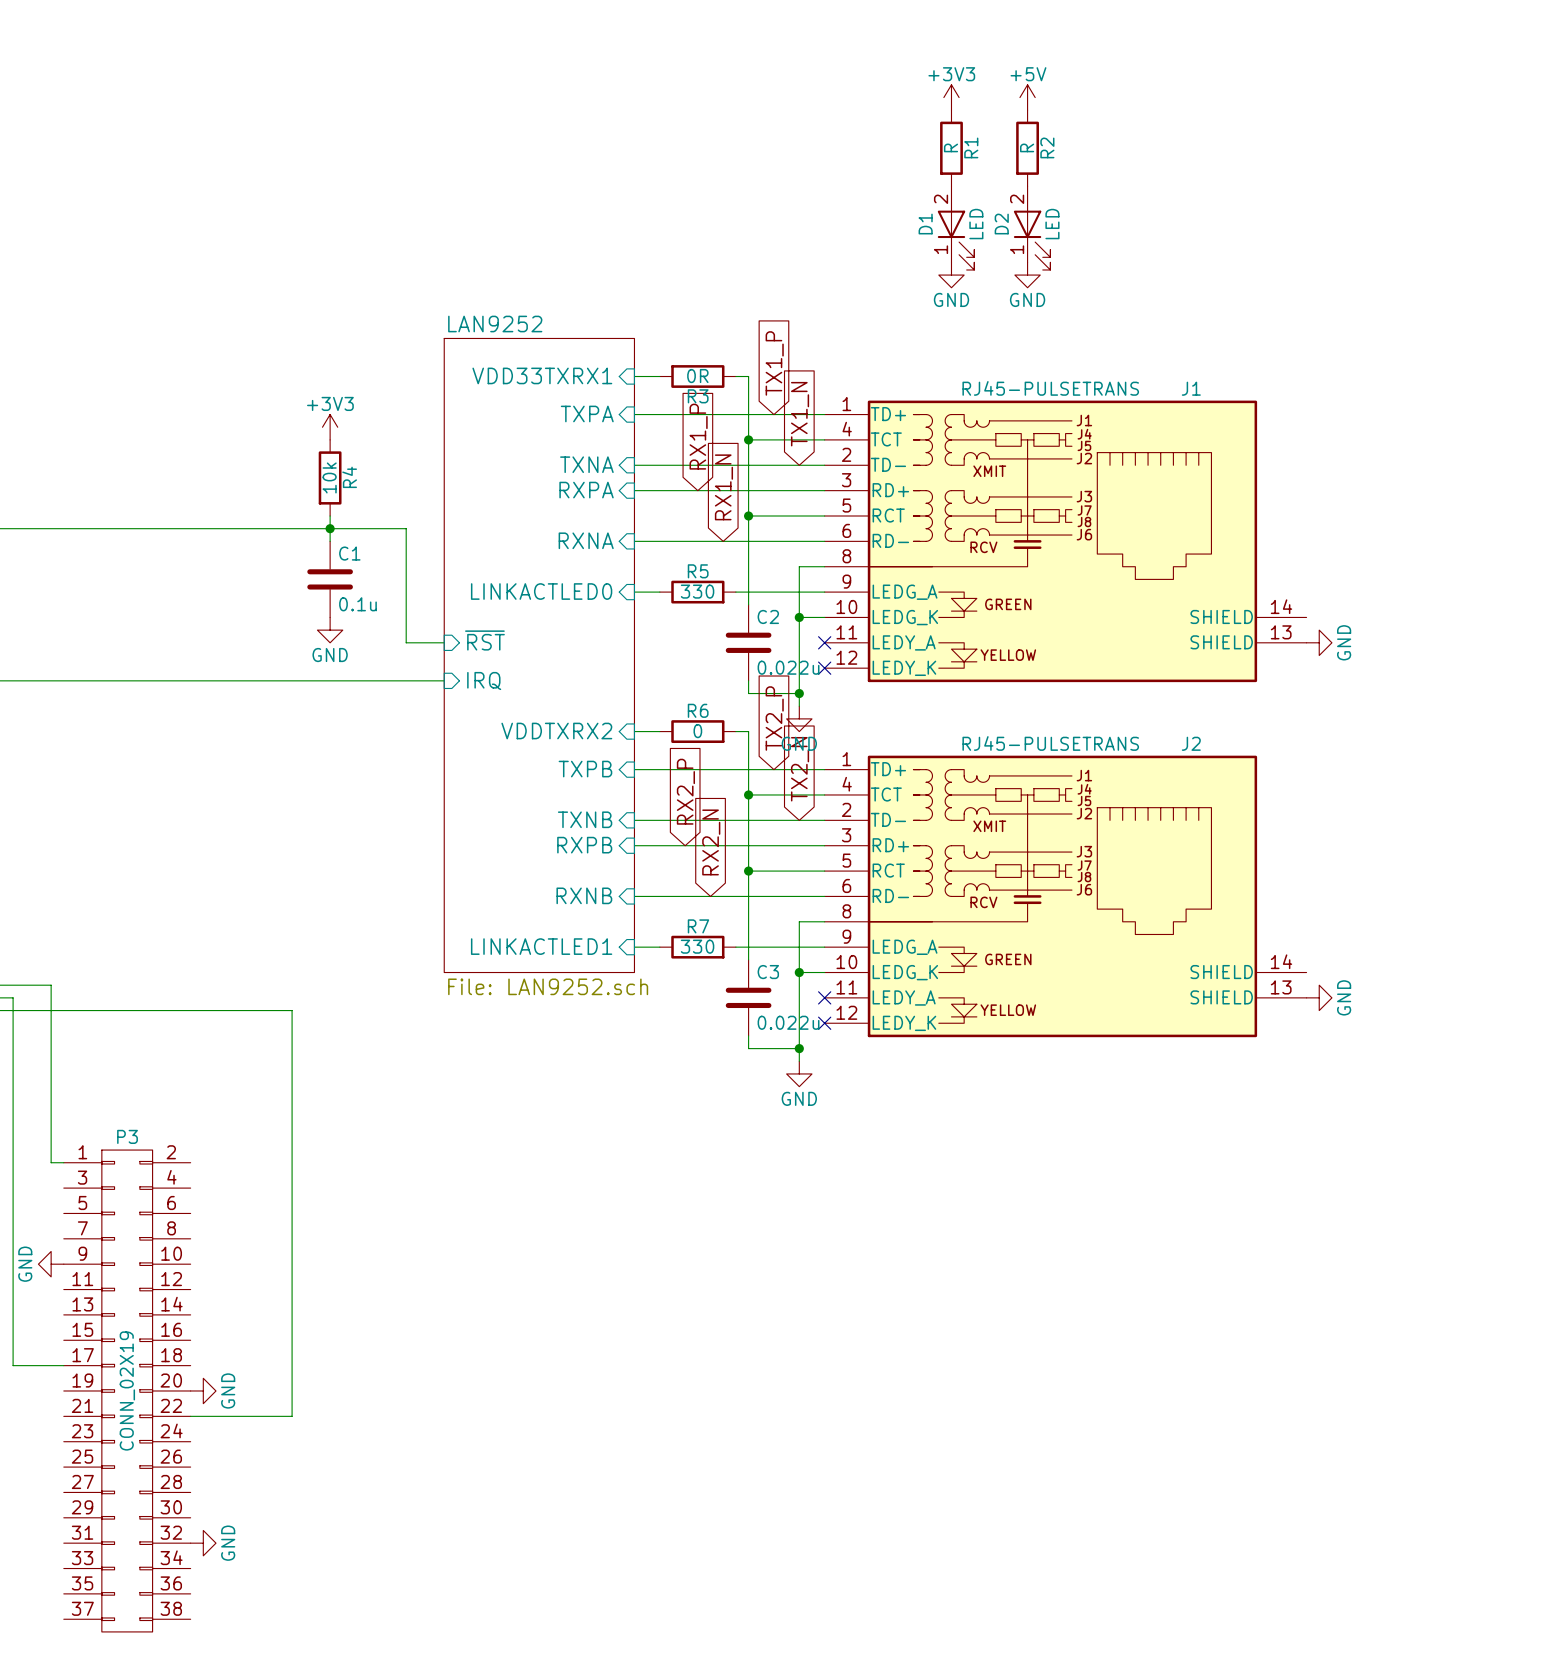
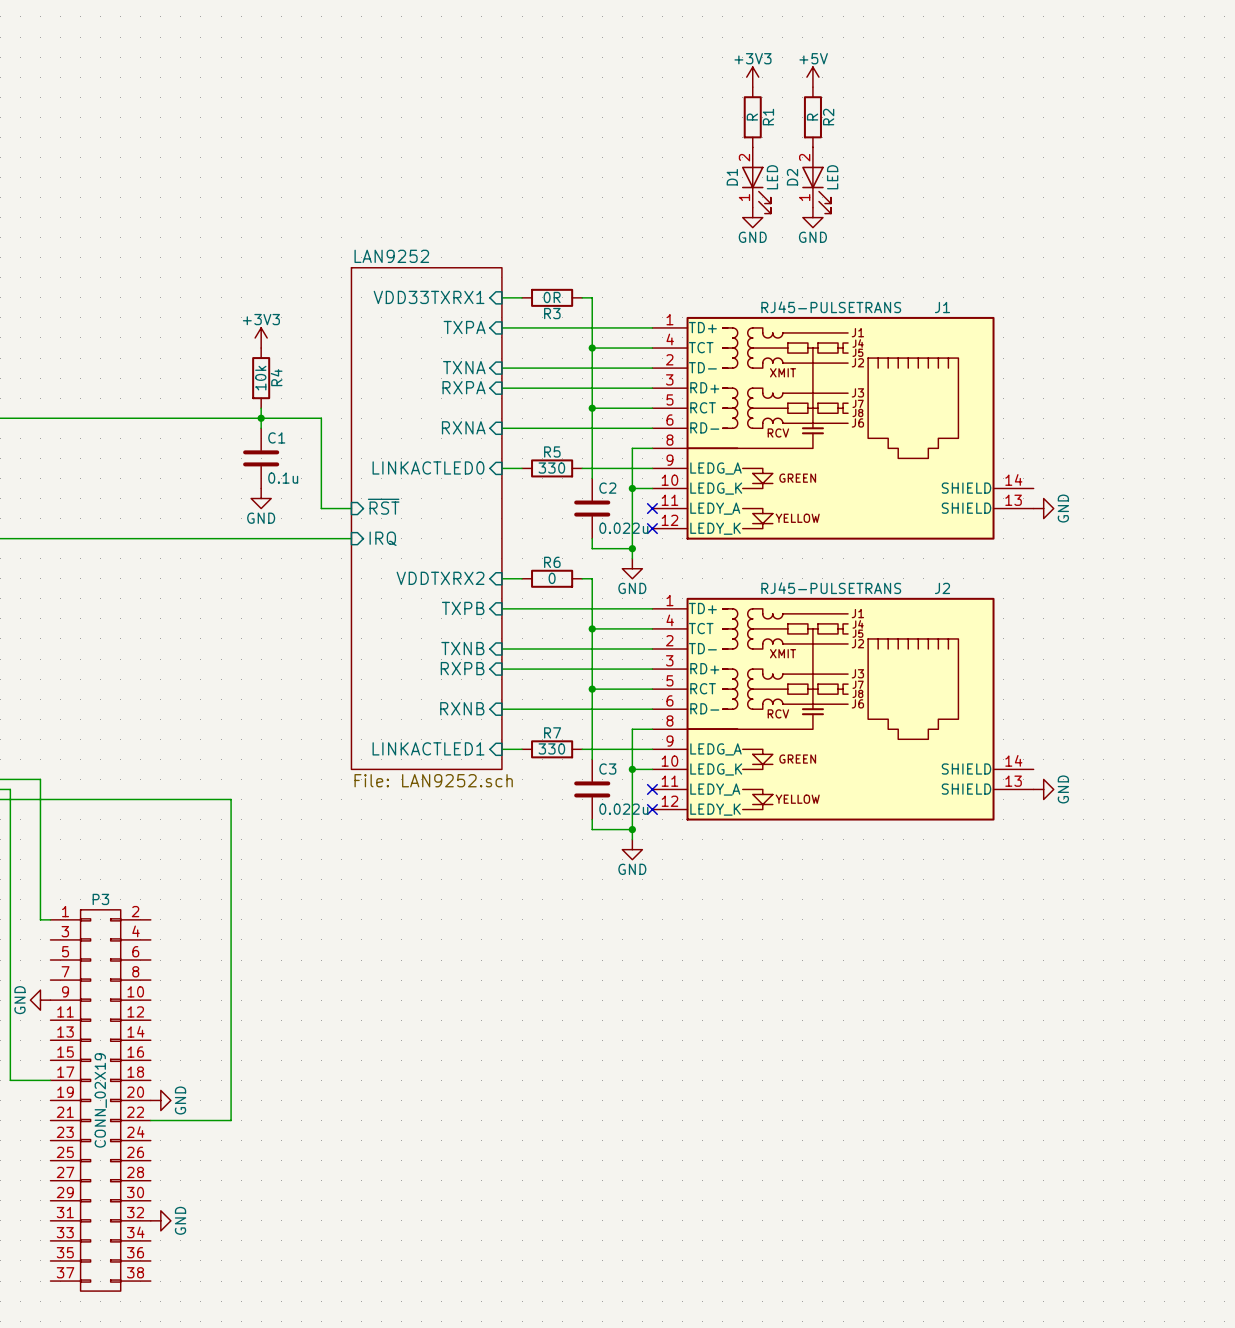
global label: TX1_P (774, 363) -> none
global label: TX1_N (800, 414) -> none
global label: RX1_P (698, 436) -> none
global label: RX1_N (723, 487) -> none
global label: TX2_P (774, 718) -> none
global label: TX2_N (800, 769) -> none
global label: RX2_P (685, 791) -> none
global label: RX2_N (711, 842) -> none

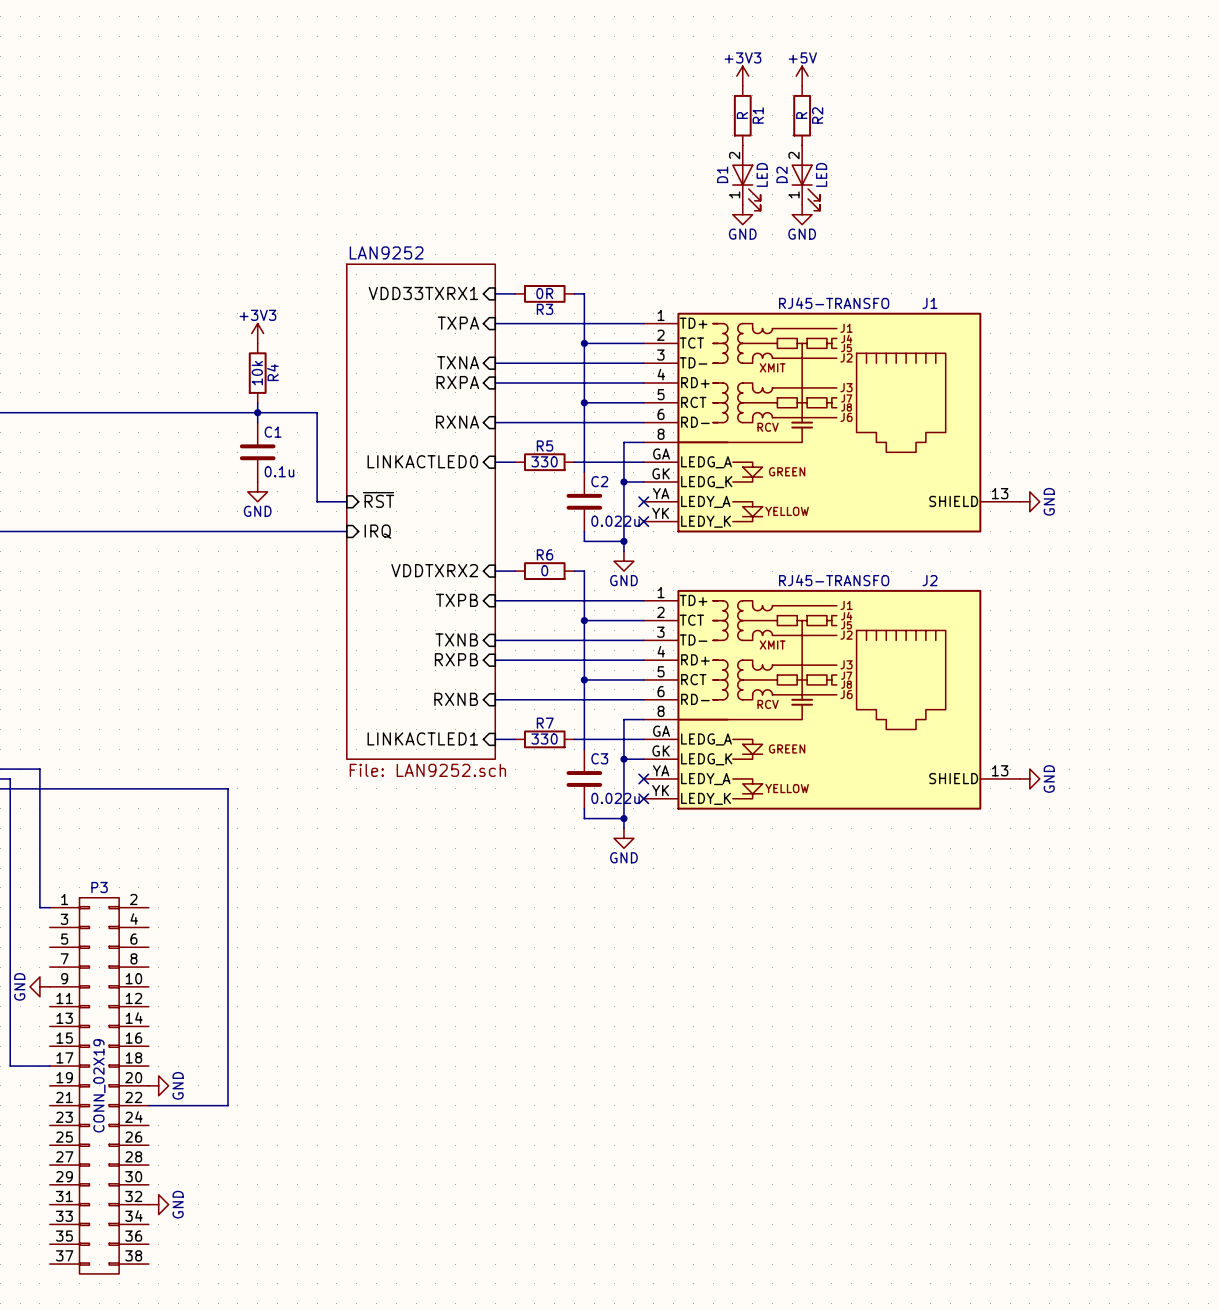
J1 value: RJ45-PULSETRANS (831, 307) -> RJ45-TRANSFO (834, 303)
J1 symbol: [652, 316, 1034, 540] -> [643, 312, 1020, 533]
J2 value: RJ45-PULSETRANS (831, 588) -> RJ45-TRANSFO (834, 580)
J2 symbol: [652, 597, 1034, 821] -> [643, 589, 1020, 810]

